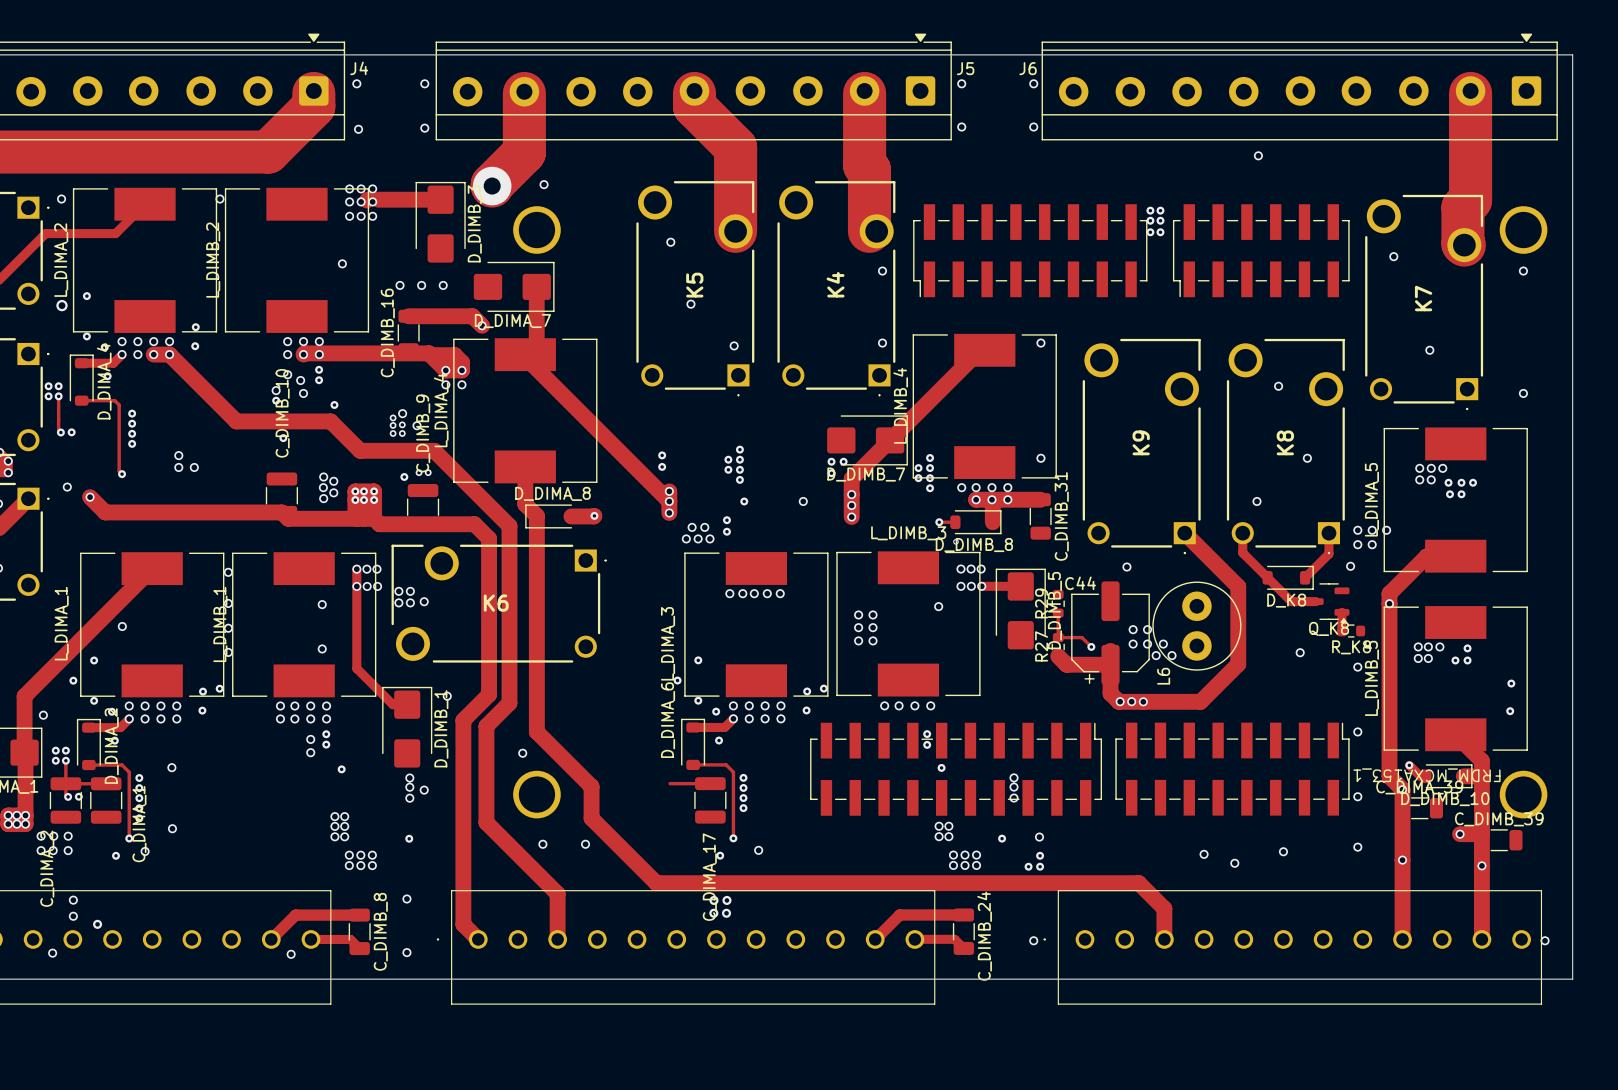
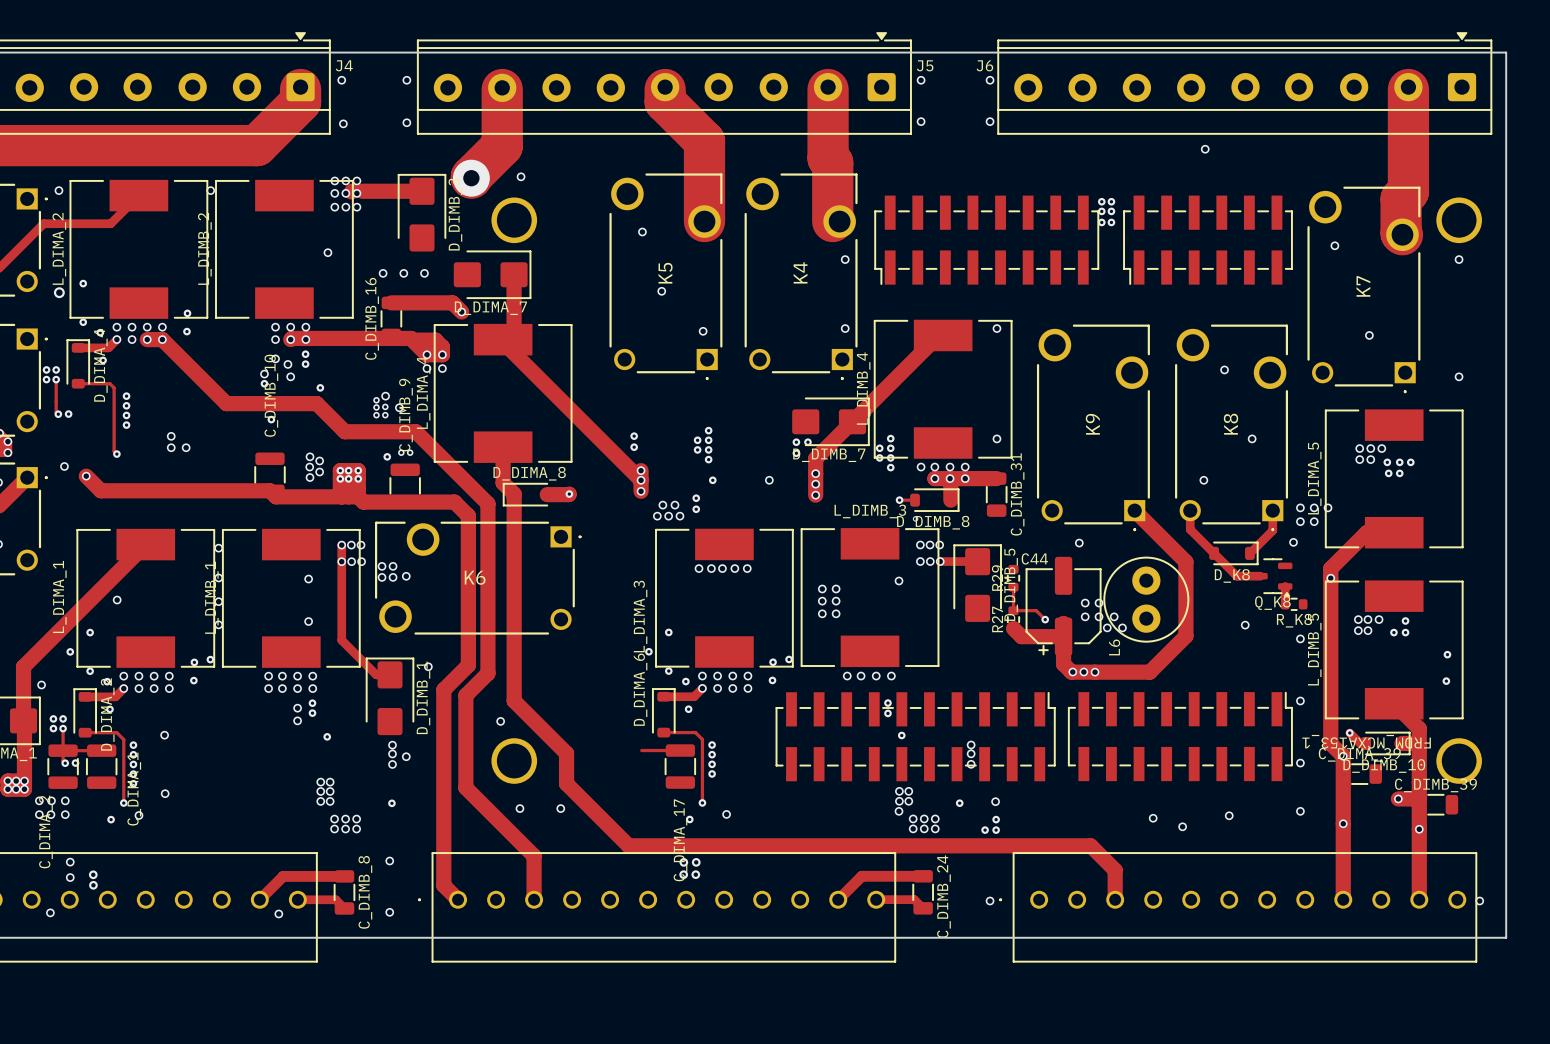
via: none -> (899, 811)
via: none -> (93, 874)

